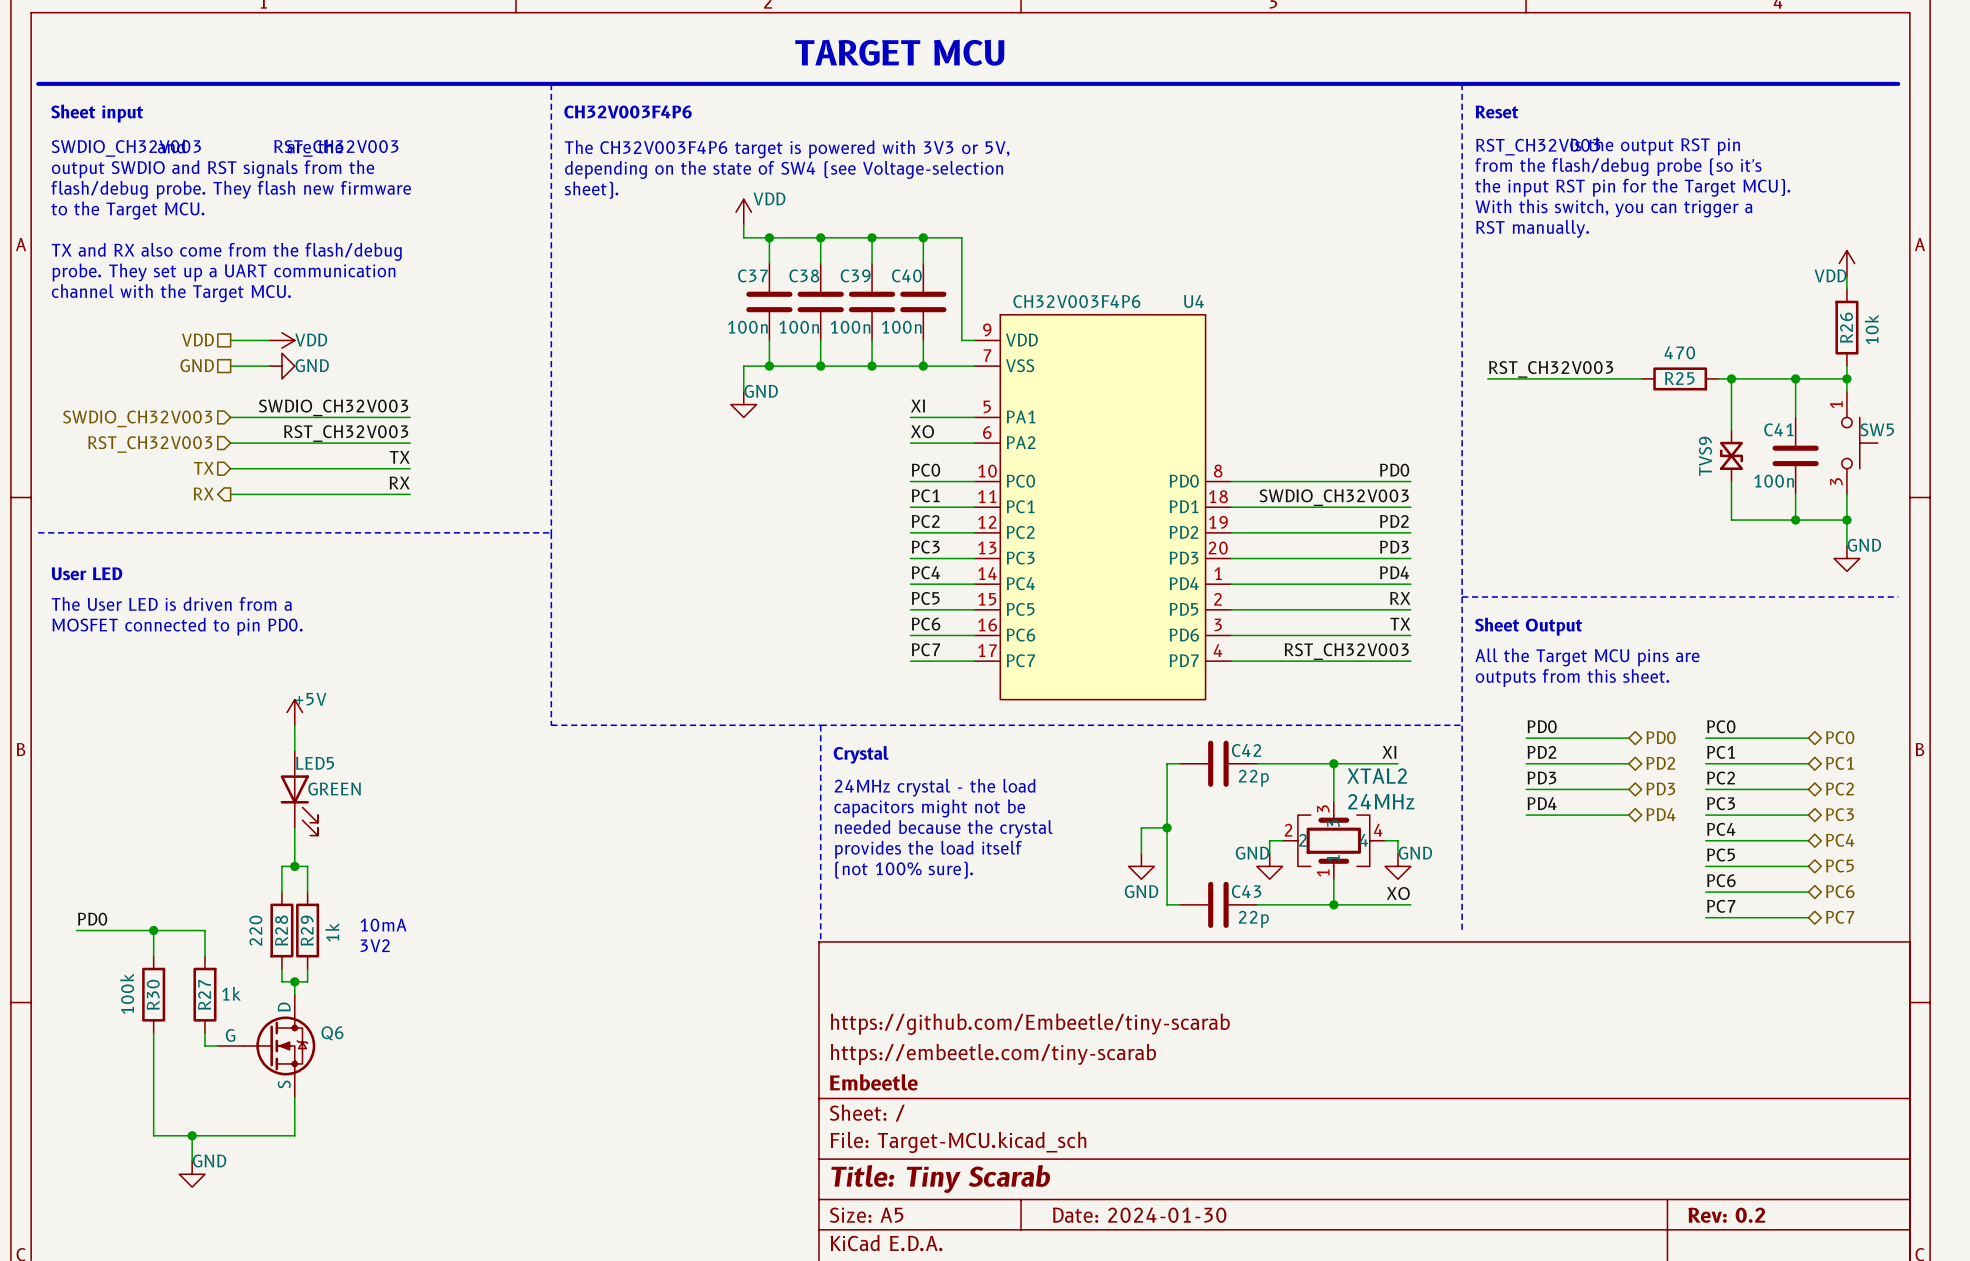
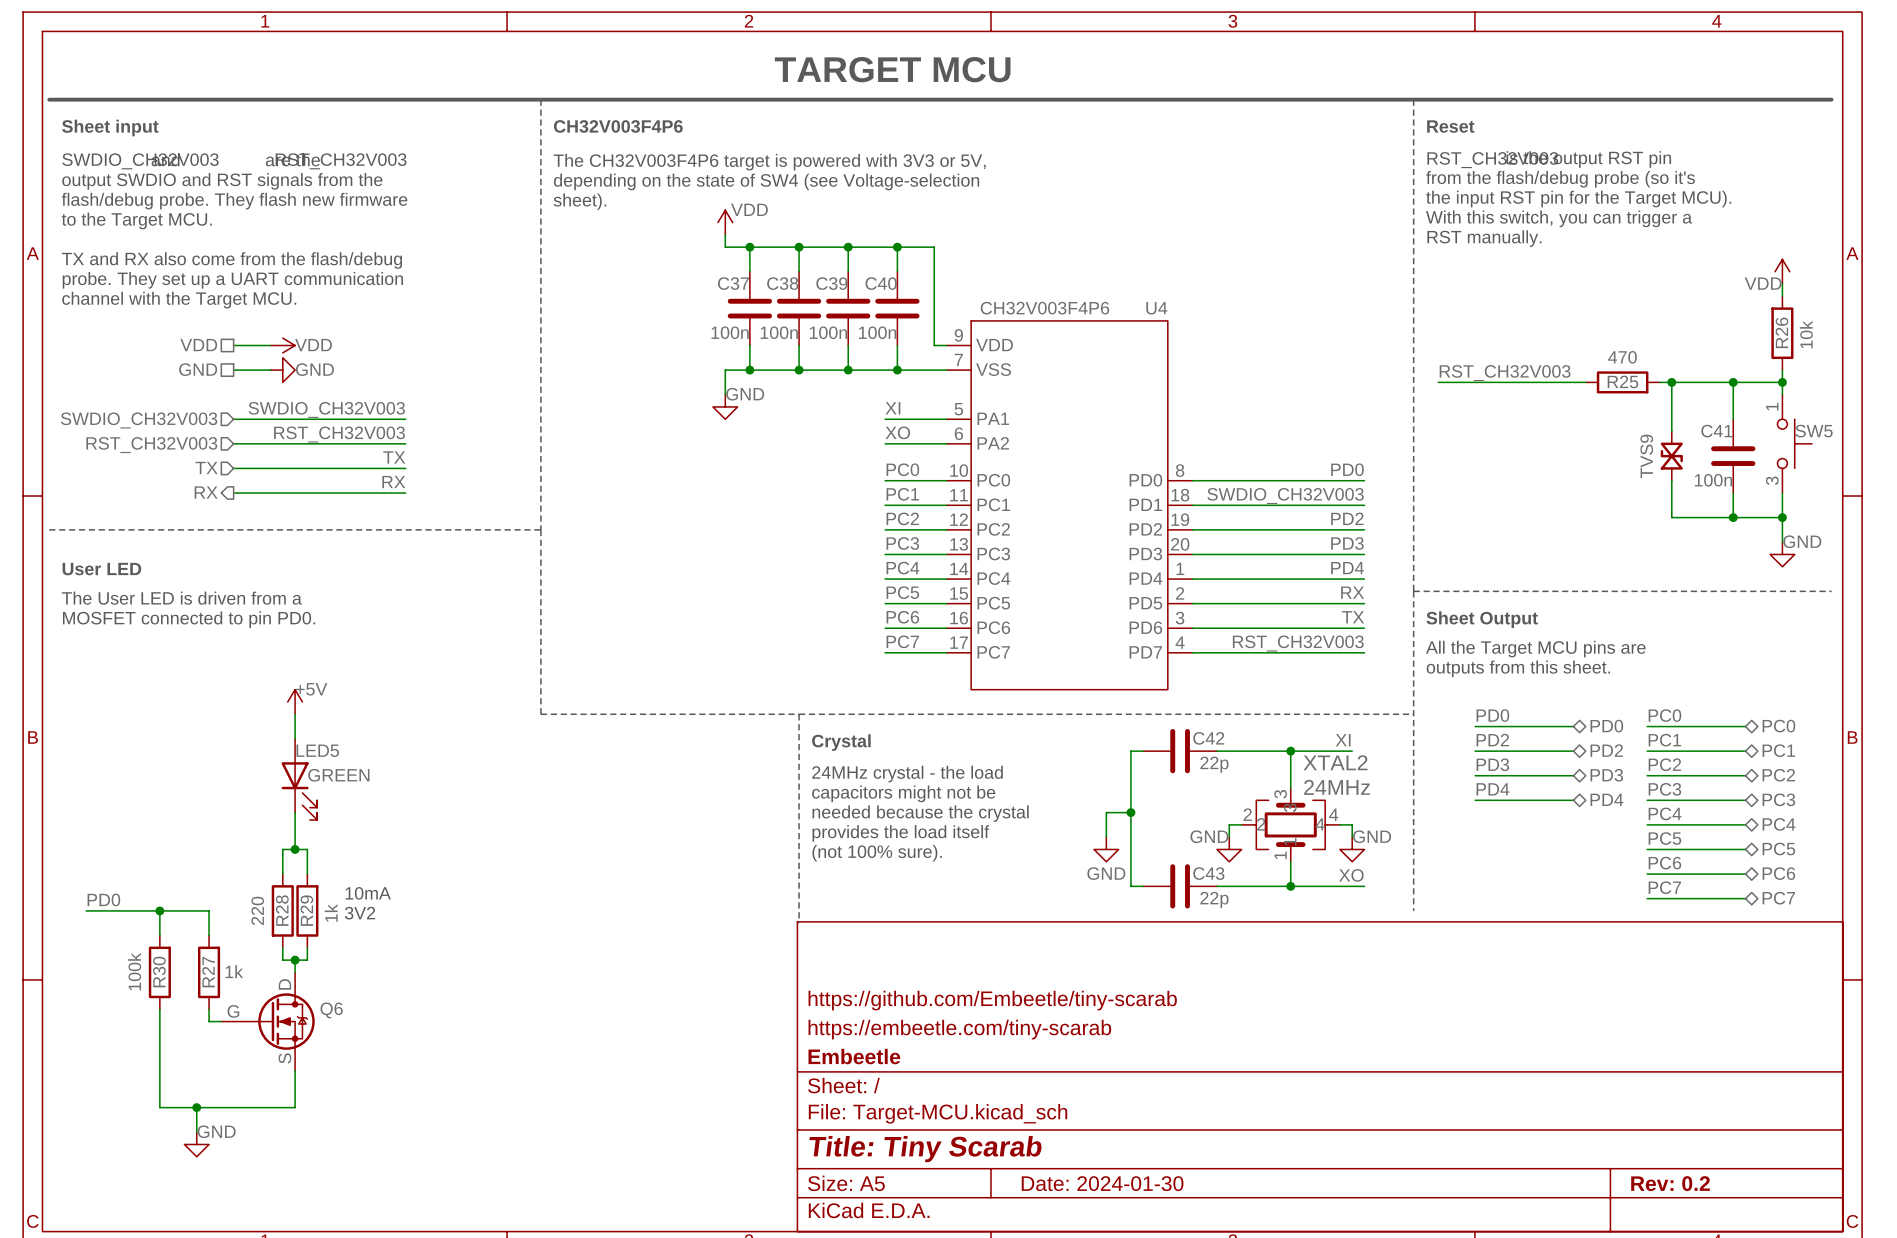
text position: 10mA (383, 925) -> 10mA (368, 893)
text position: 3V2 (375, 945) -> 3V2 (360, 913)

